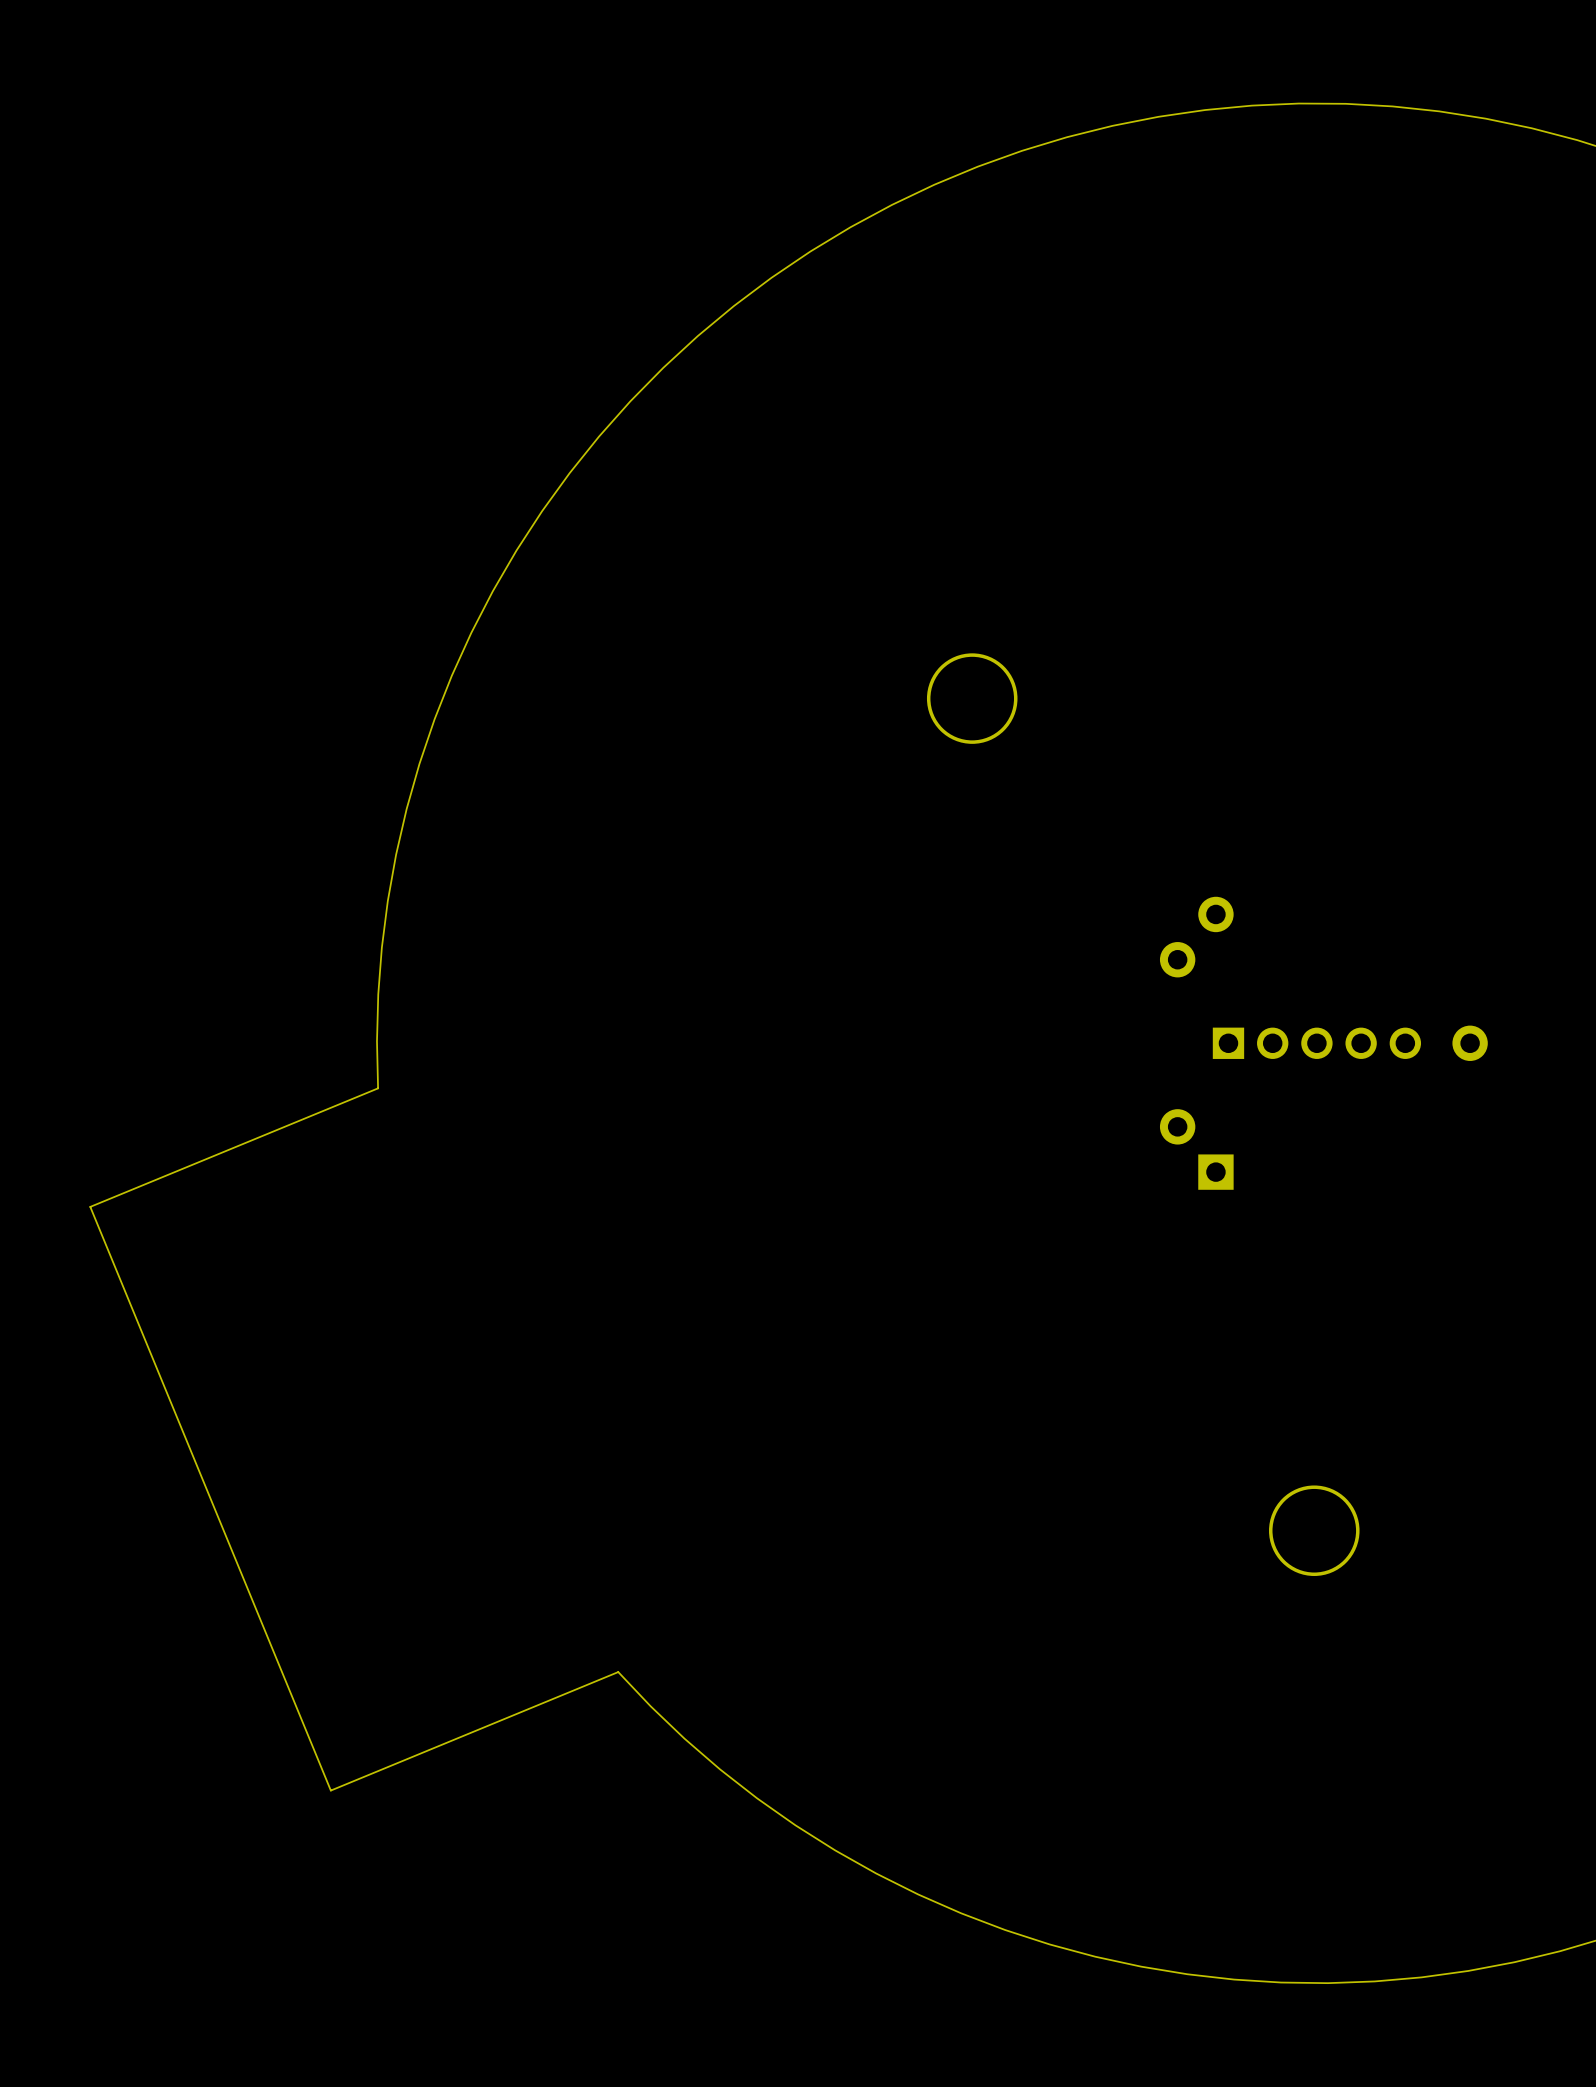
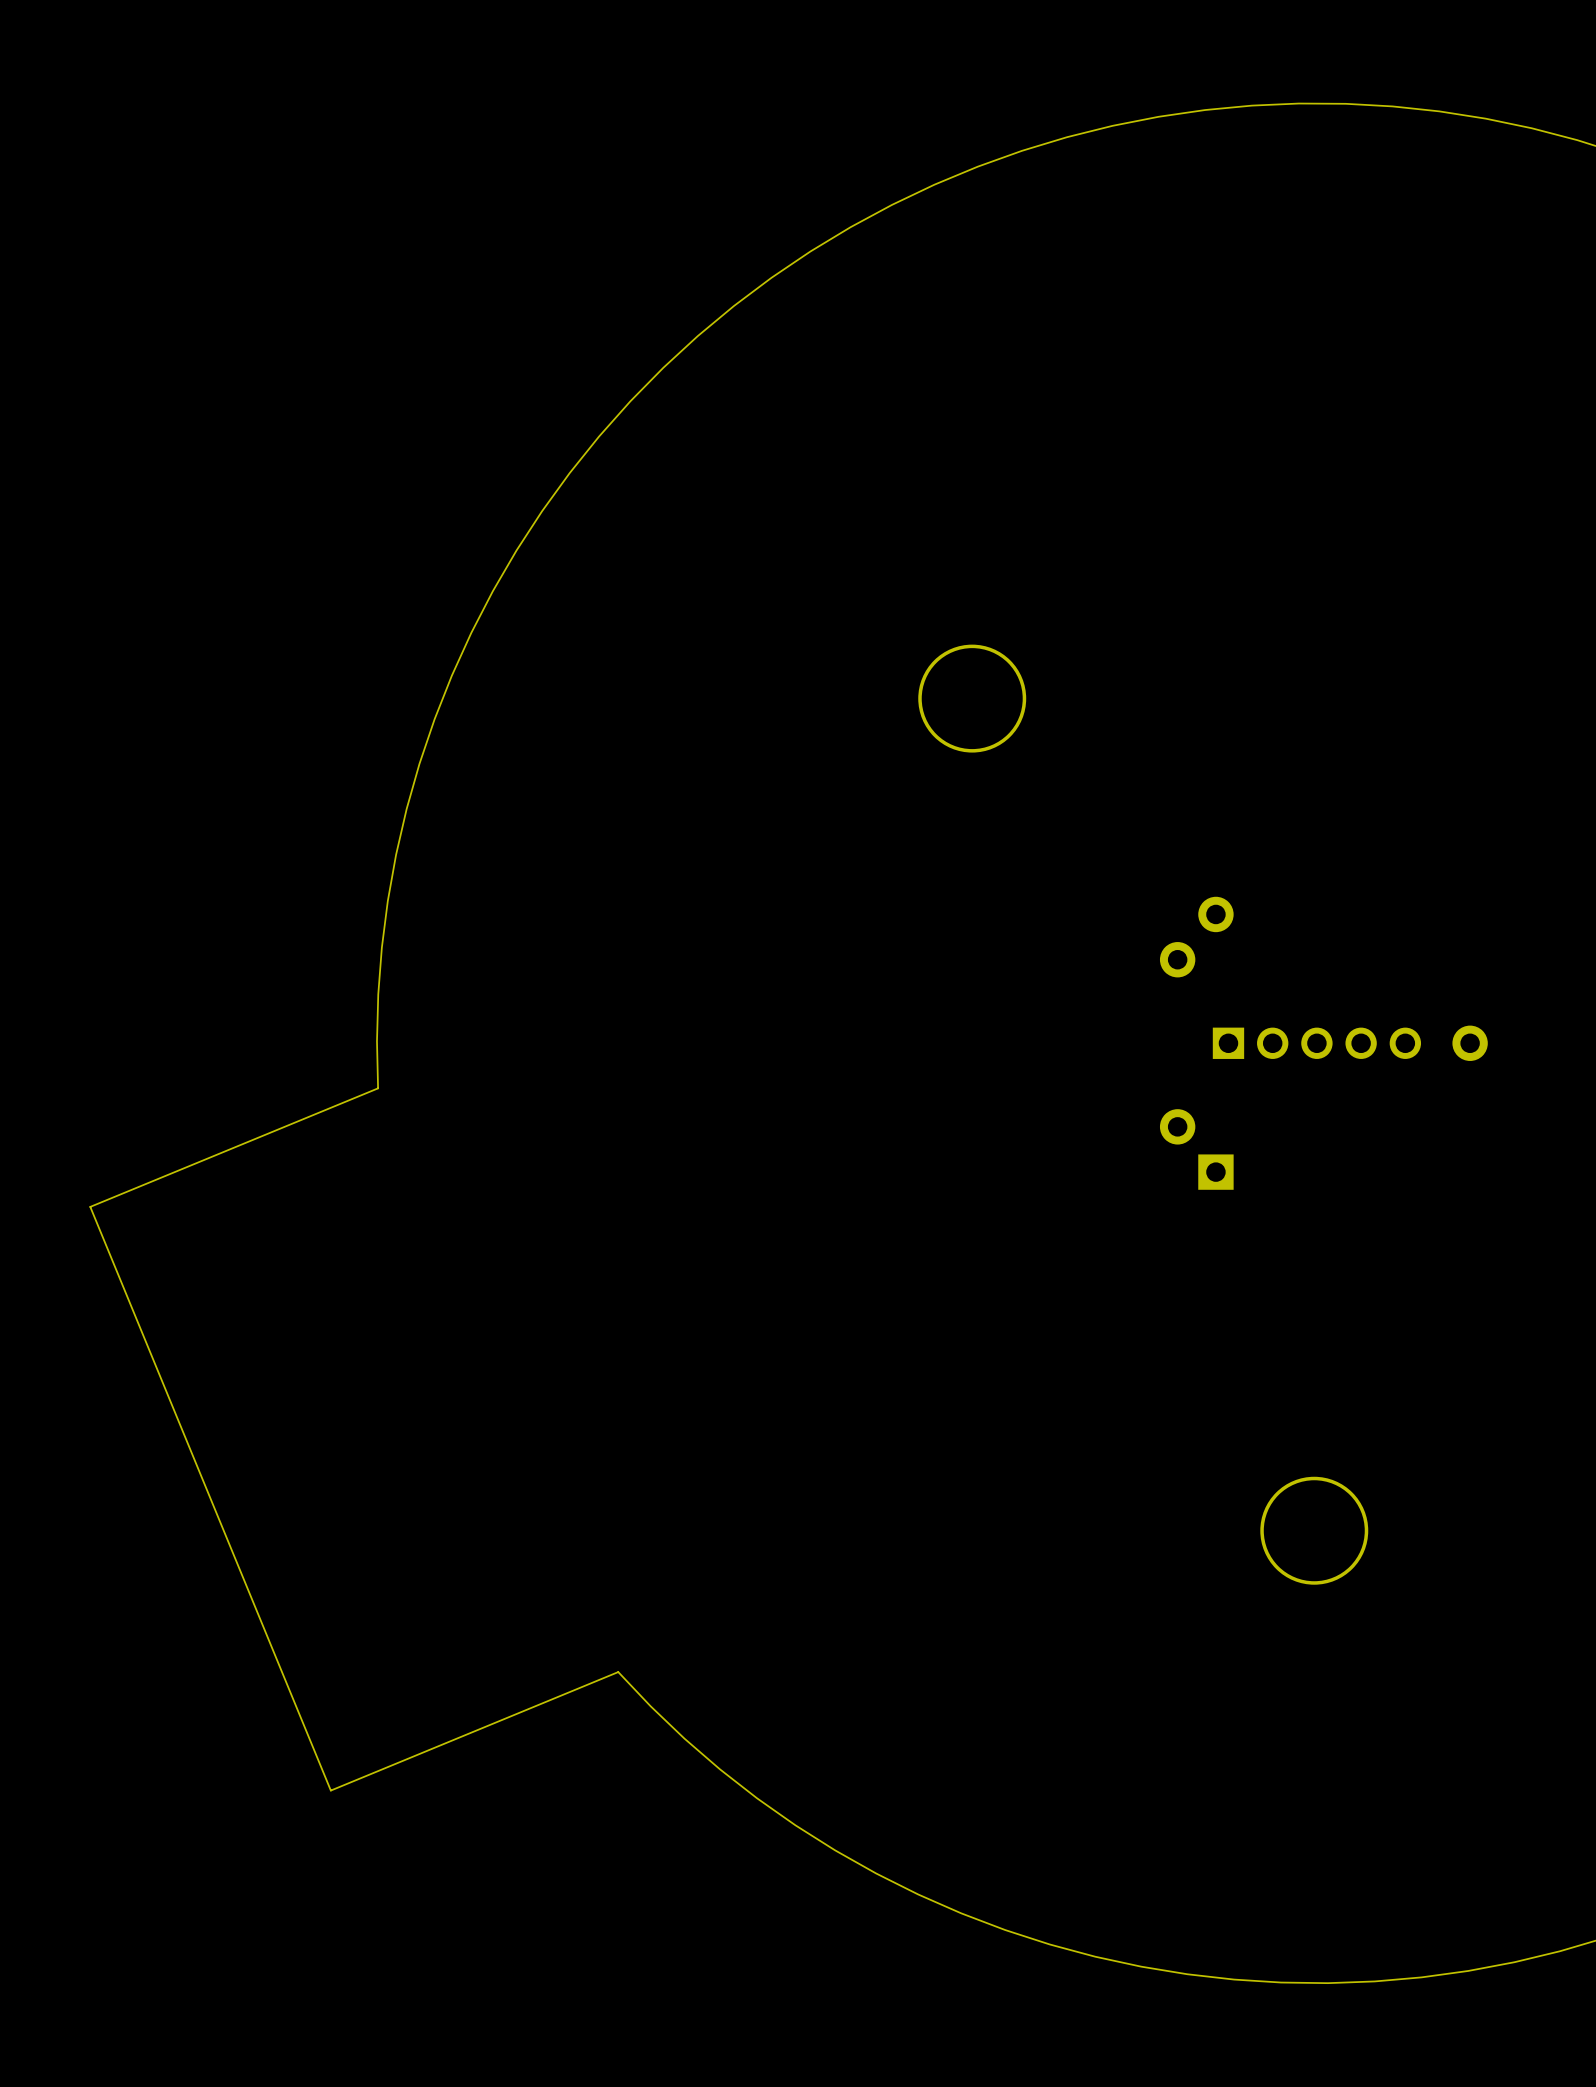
round board edge size: [926, 653, 1018, 744] -> [918, 644, 1027, 753]
round board edge size: [1269, 1485, 1360, 1577] -> [1260, 1476, 1369, 1585]

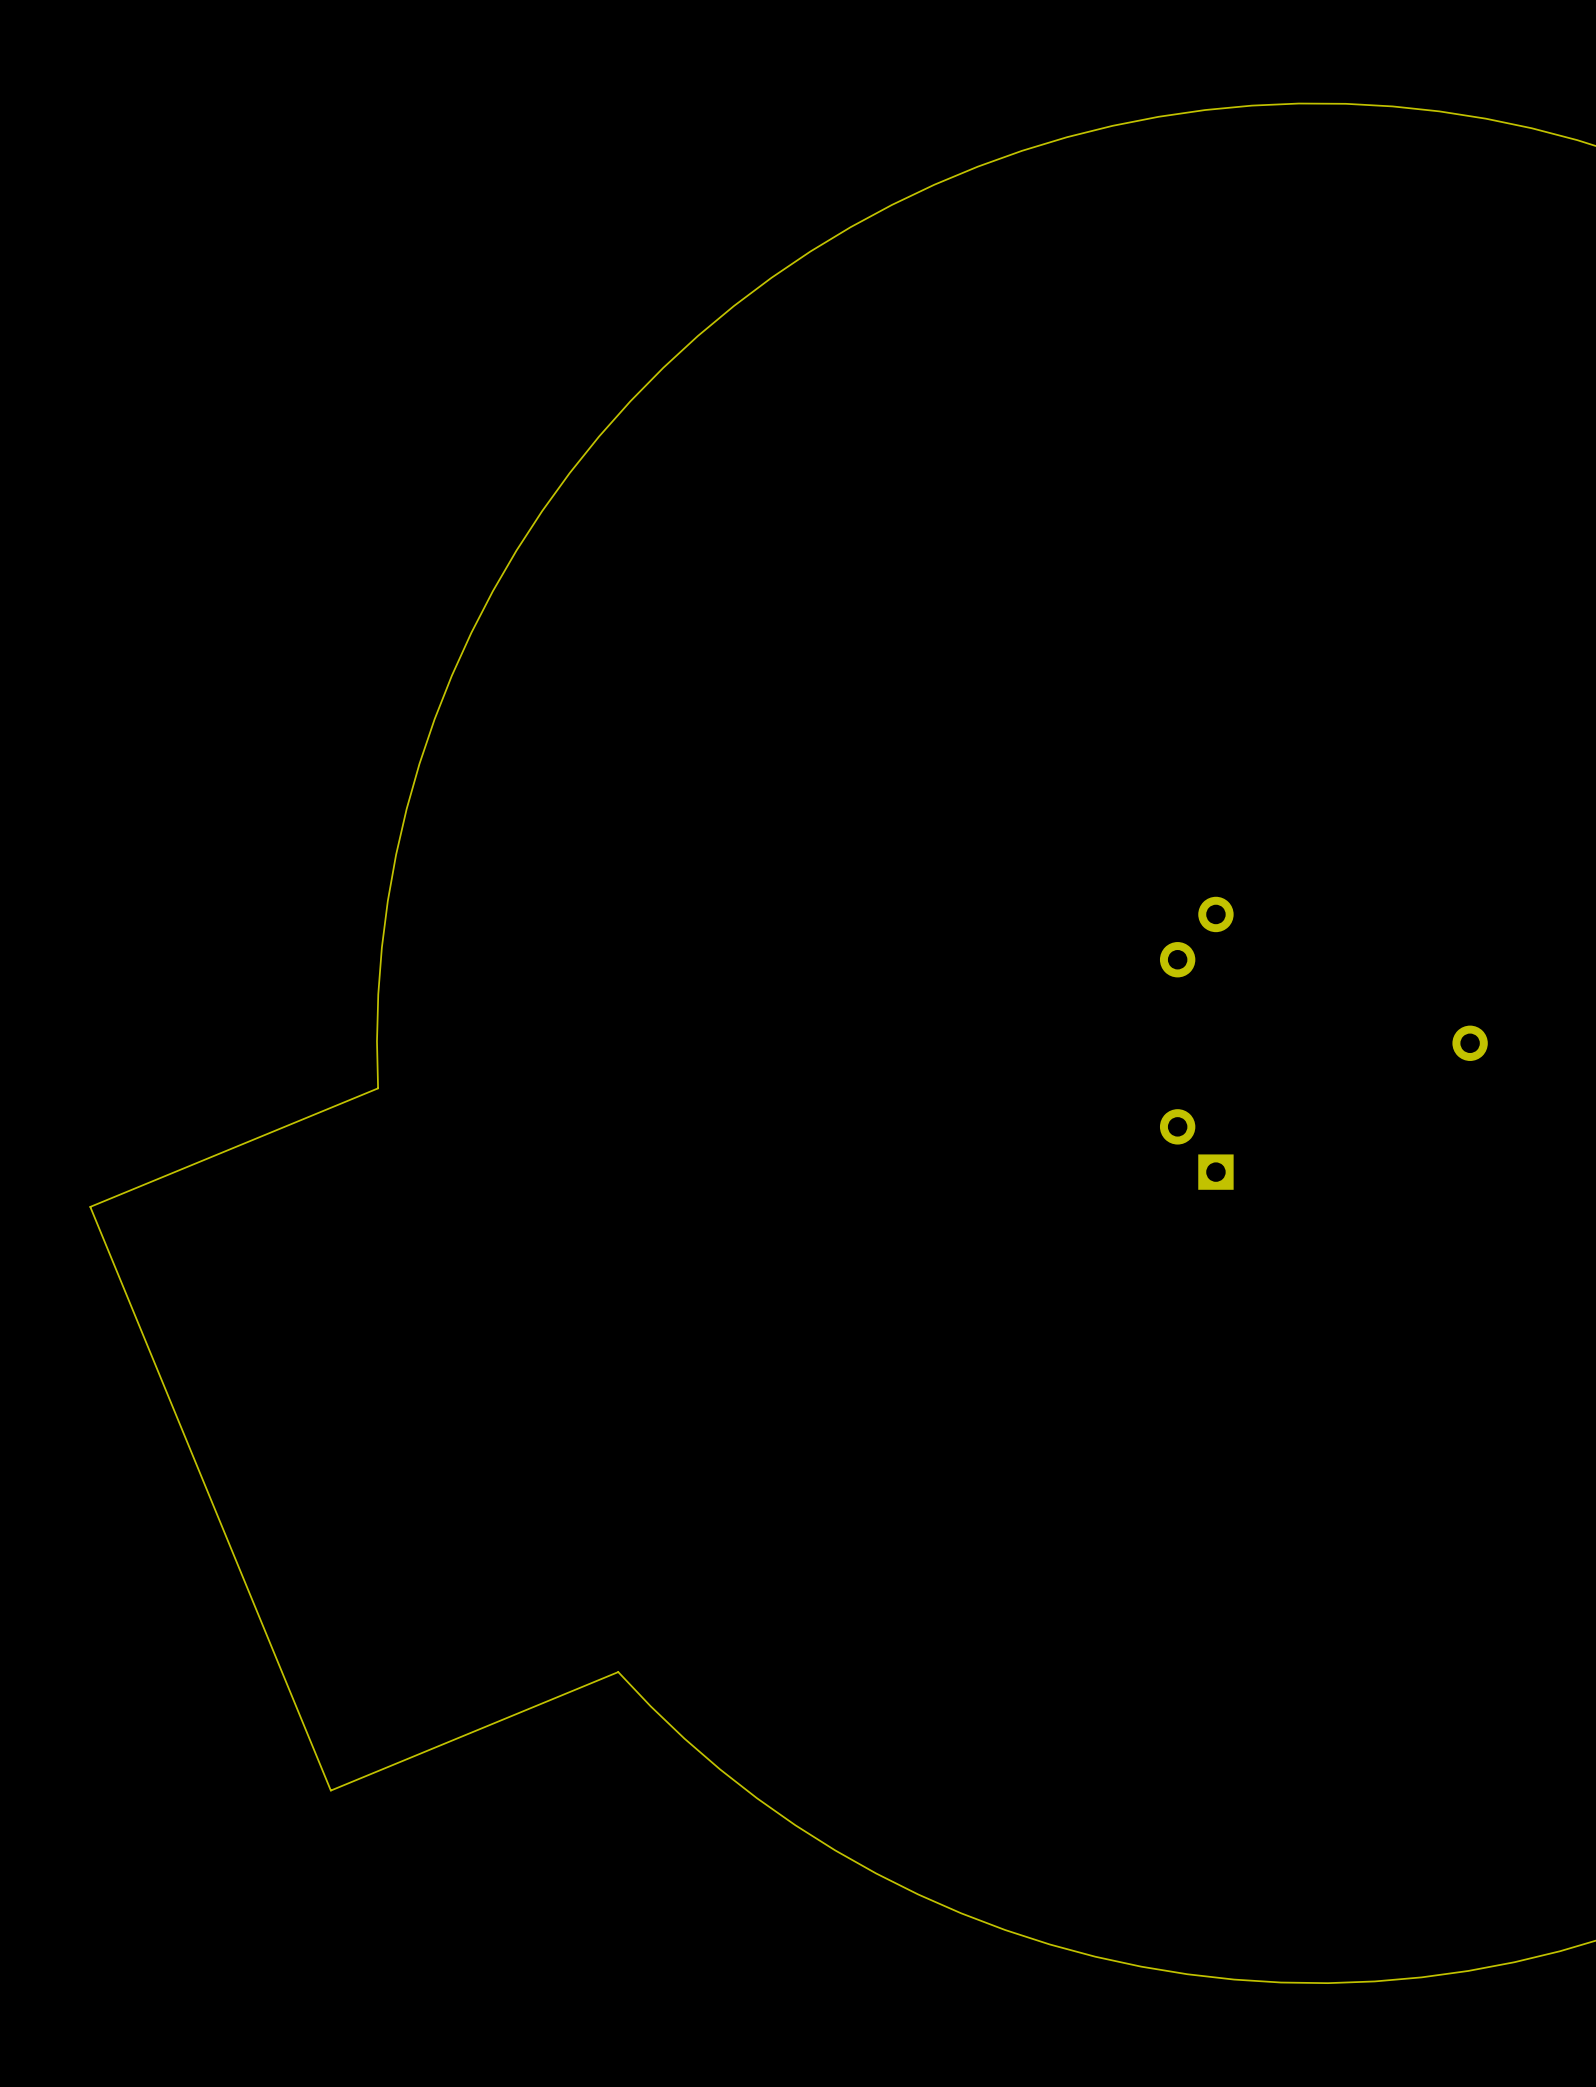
round board edge: [918, 644, 1027, 753] -> none
part: (1316, 1043) -> none
round board edge: [1260, 1476, 1369, 1585] -> none

